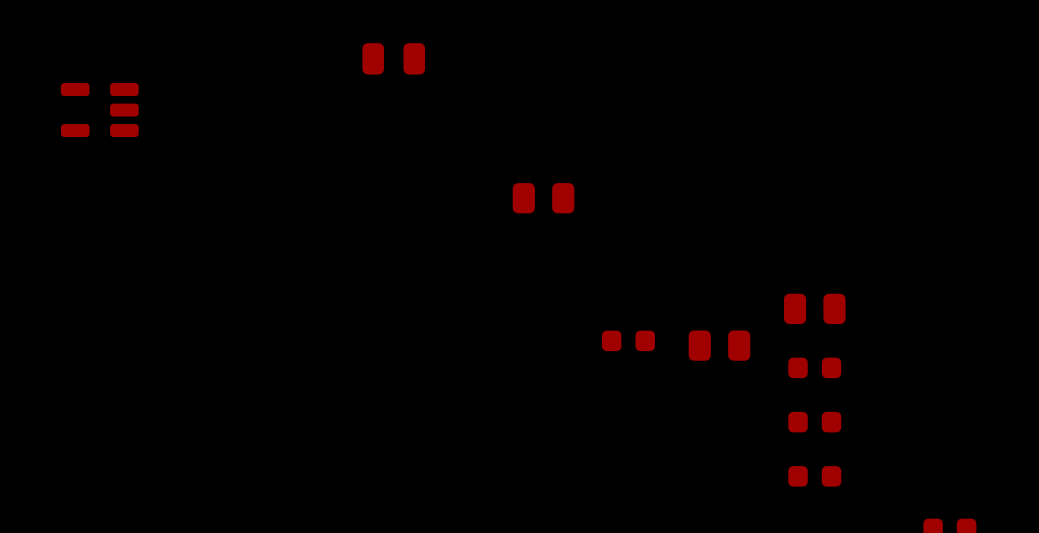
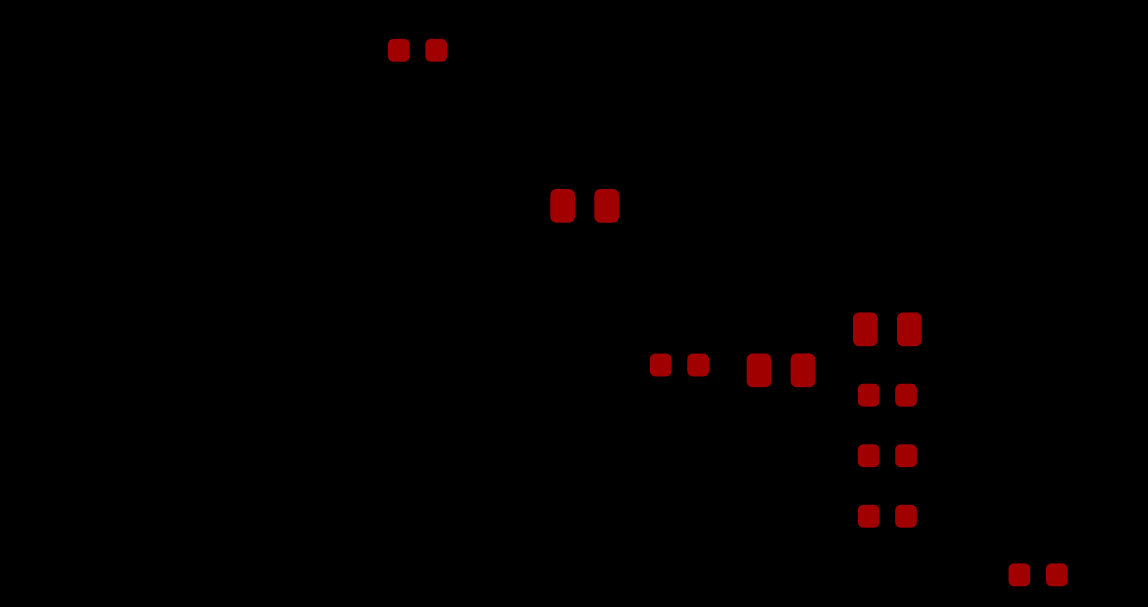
part footprint: [362, 43, 426, 75] -> [387, 38, 448, 62]
part: (99, 110) -> none

